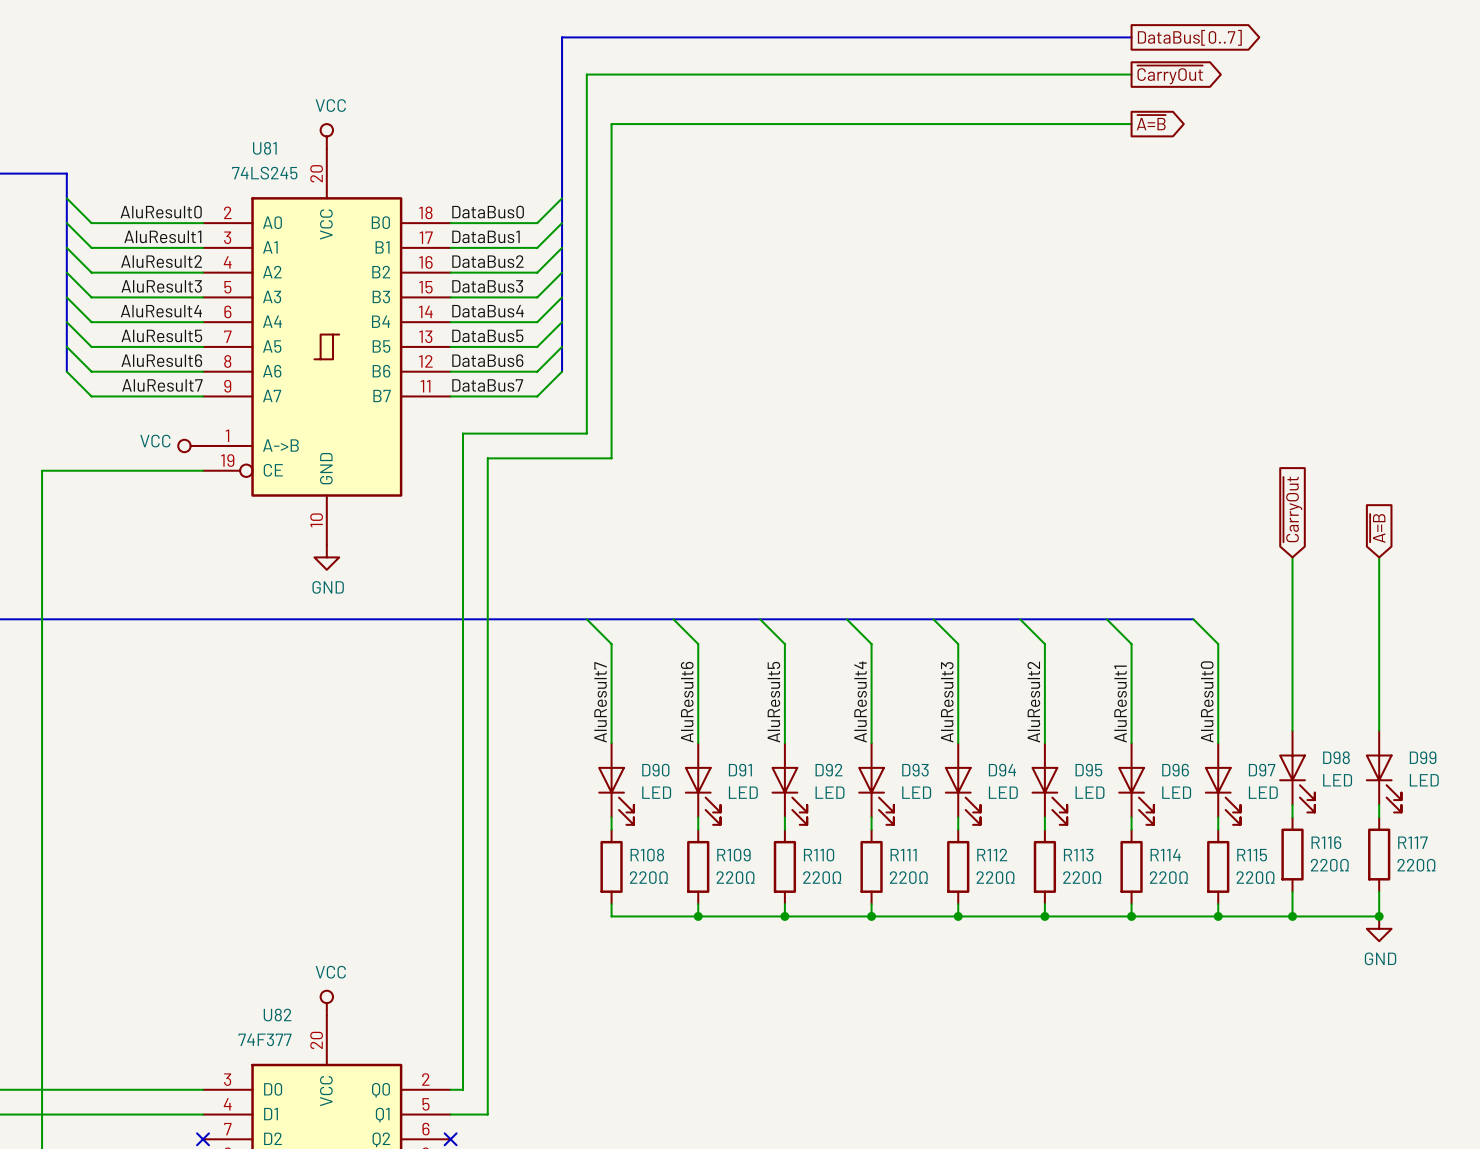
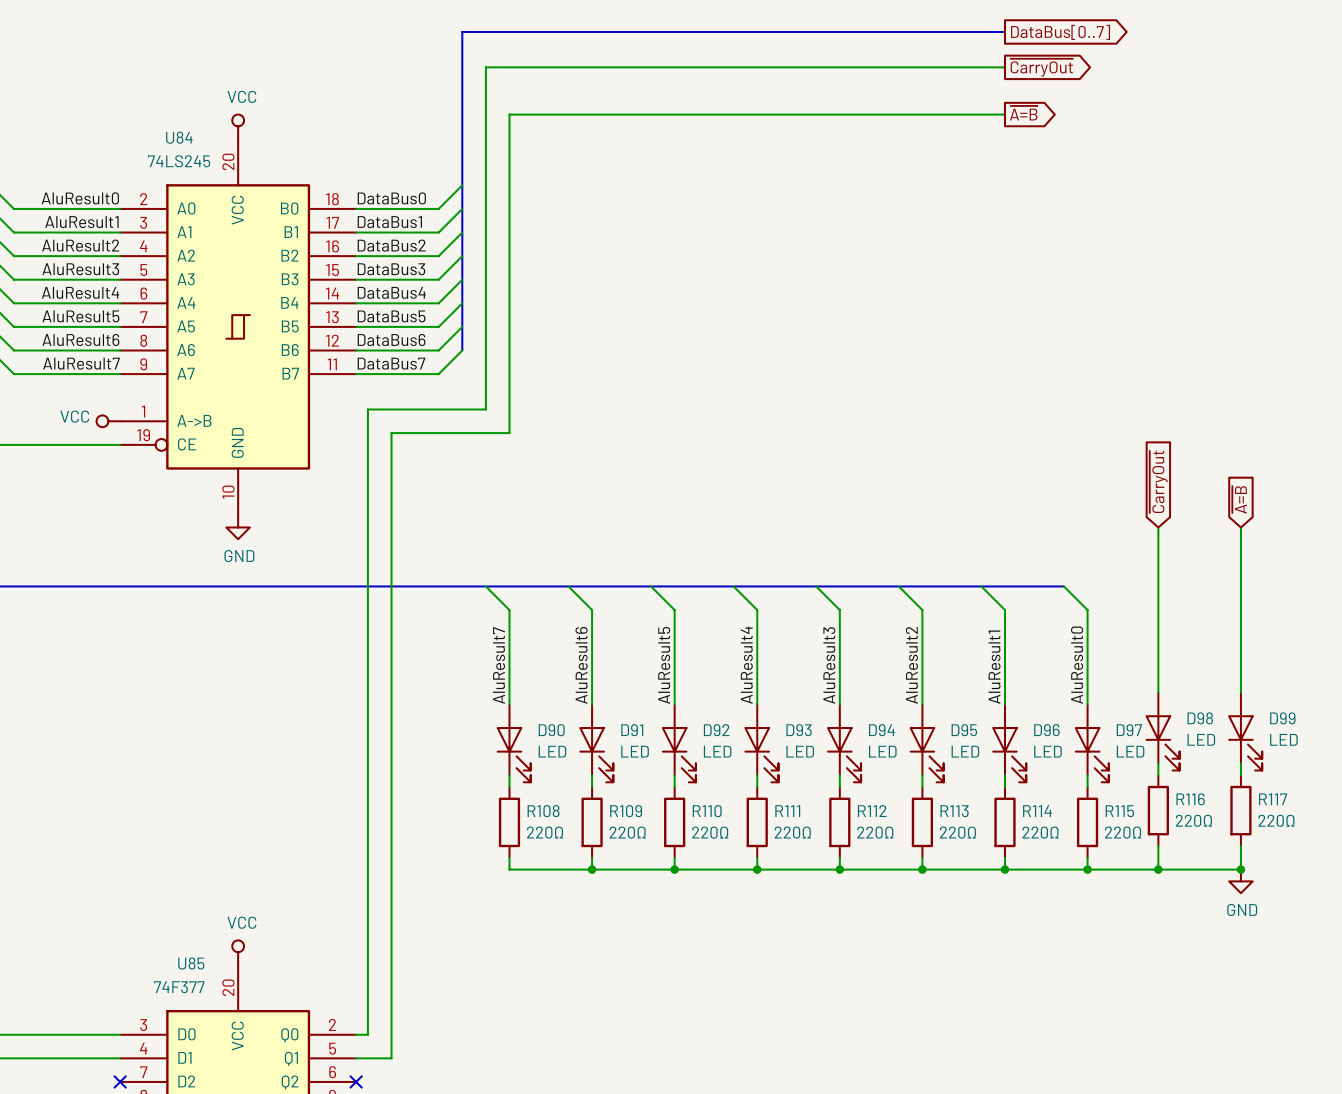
U81 name: U81 (264, 148) -> U84 (179, 137)
U82 name: U82 (277, 1015) -> U85 (191, 963)

